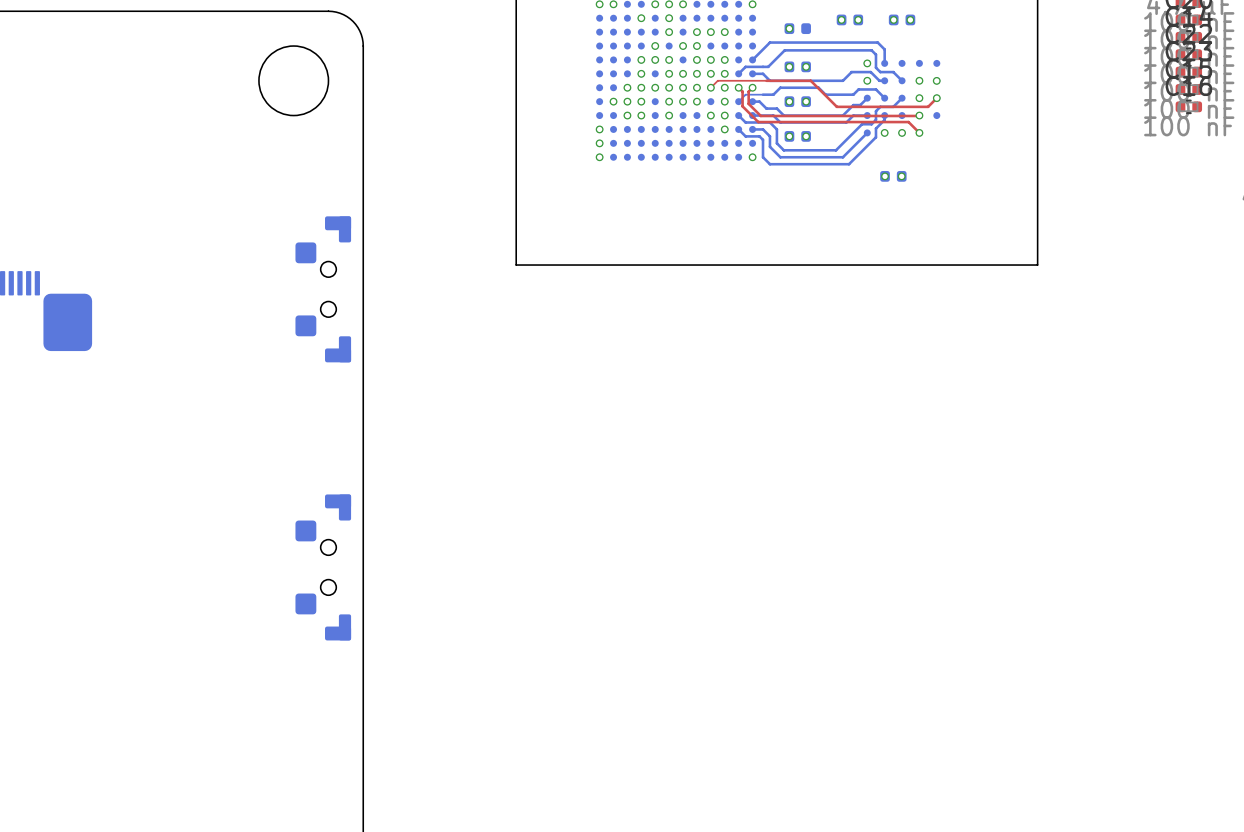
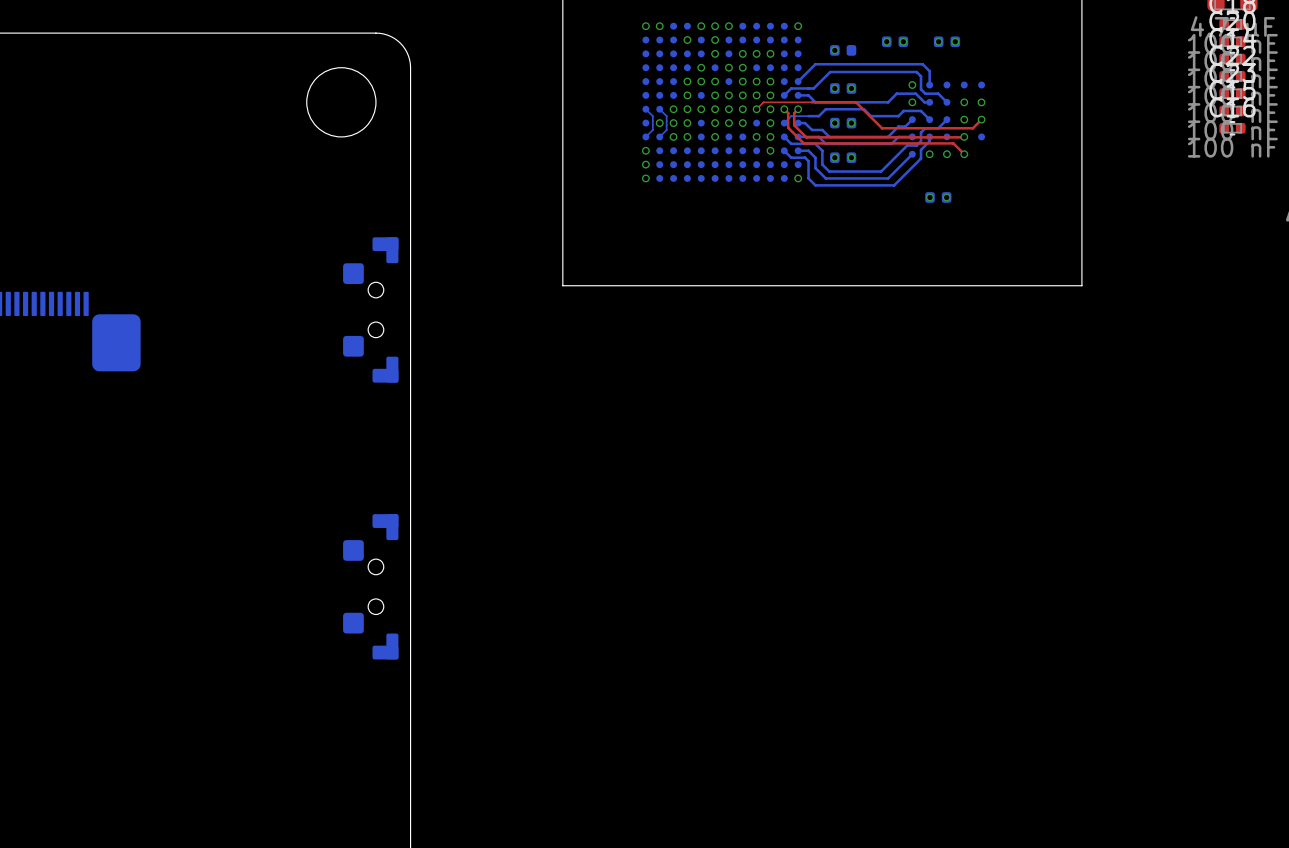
bottom track: none -> (645, 109) (652, 116) (652, 120)
bottom track: none -> (659, 109) (666, 116) (666, 120)
part: none -> (652, 123)
part: none -> (666, 123)
bottom track: none -> (652, 125) (652, 130) (645, 136)
bottom track: none -> (666, 125) (666, 130) (659, 136)

